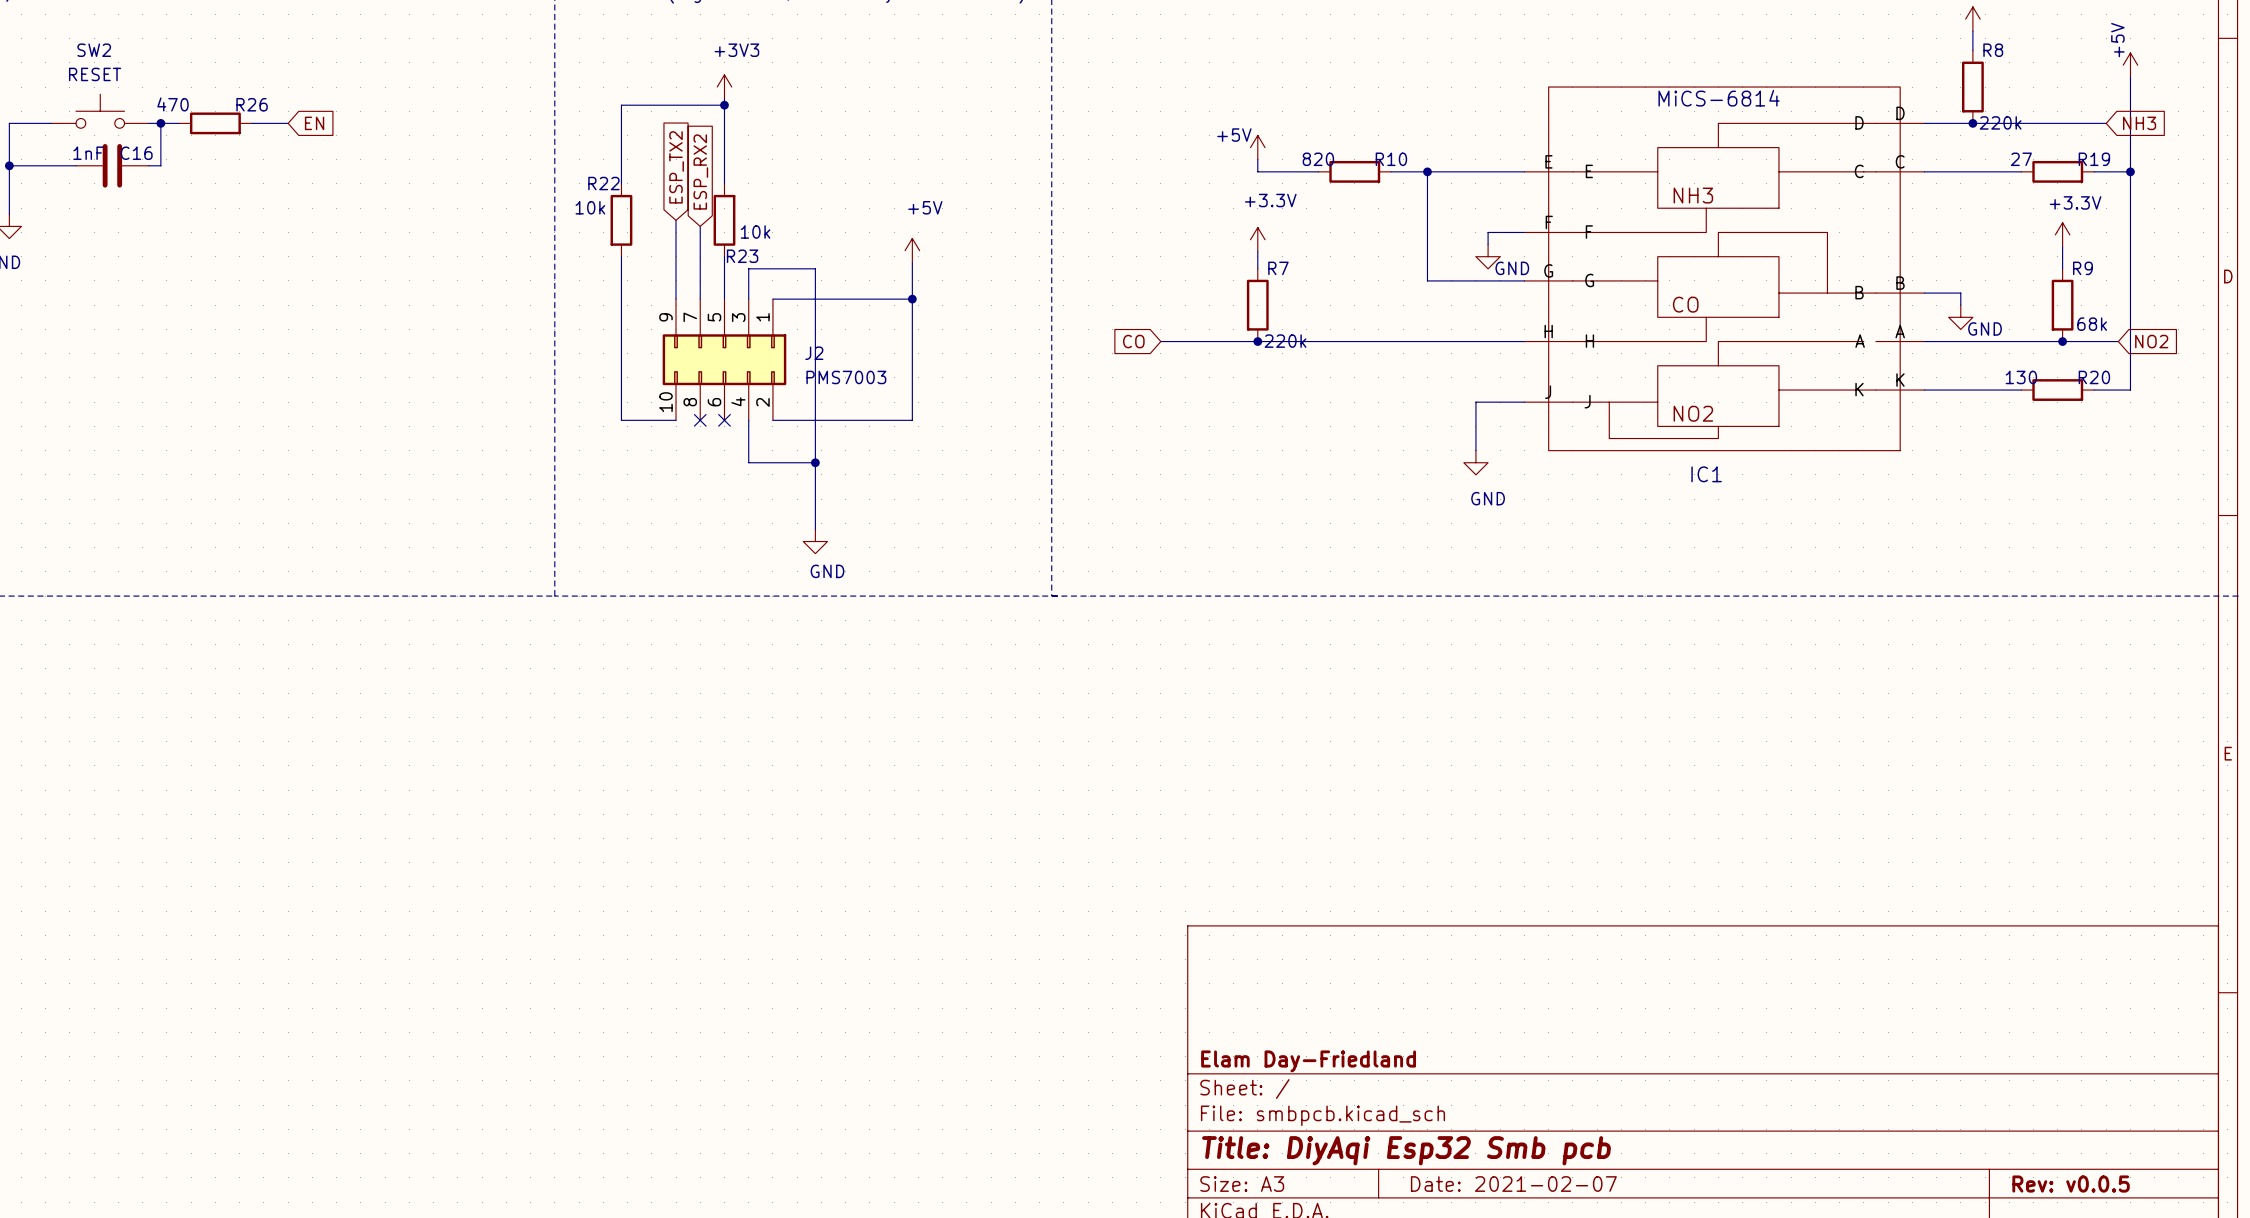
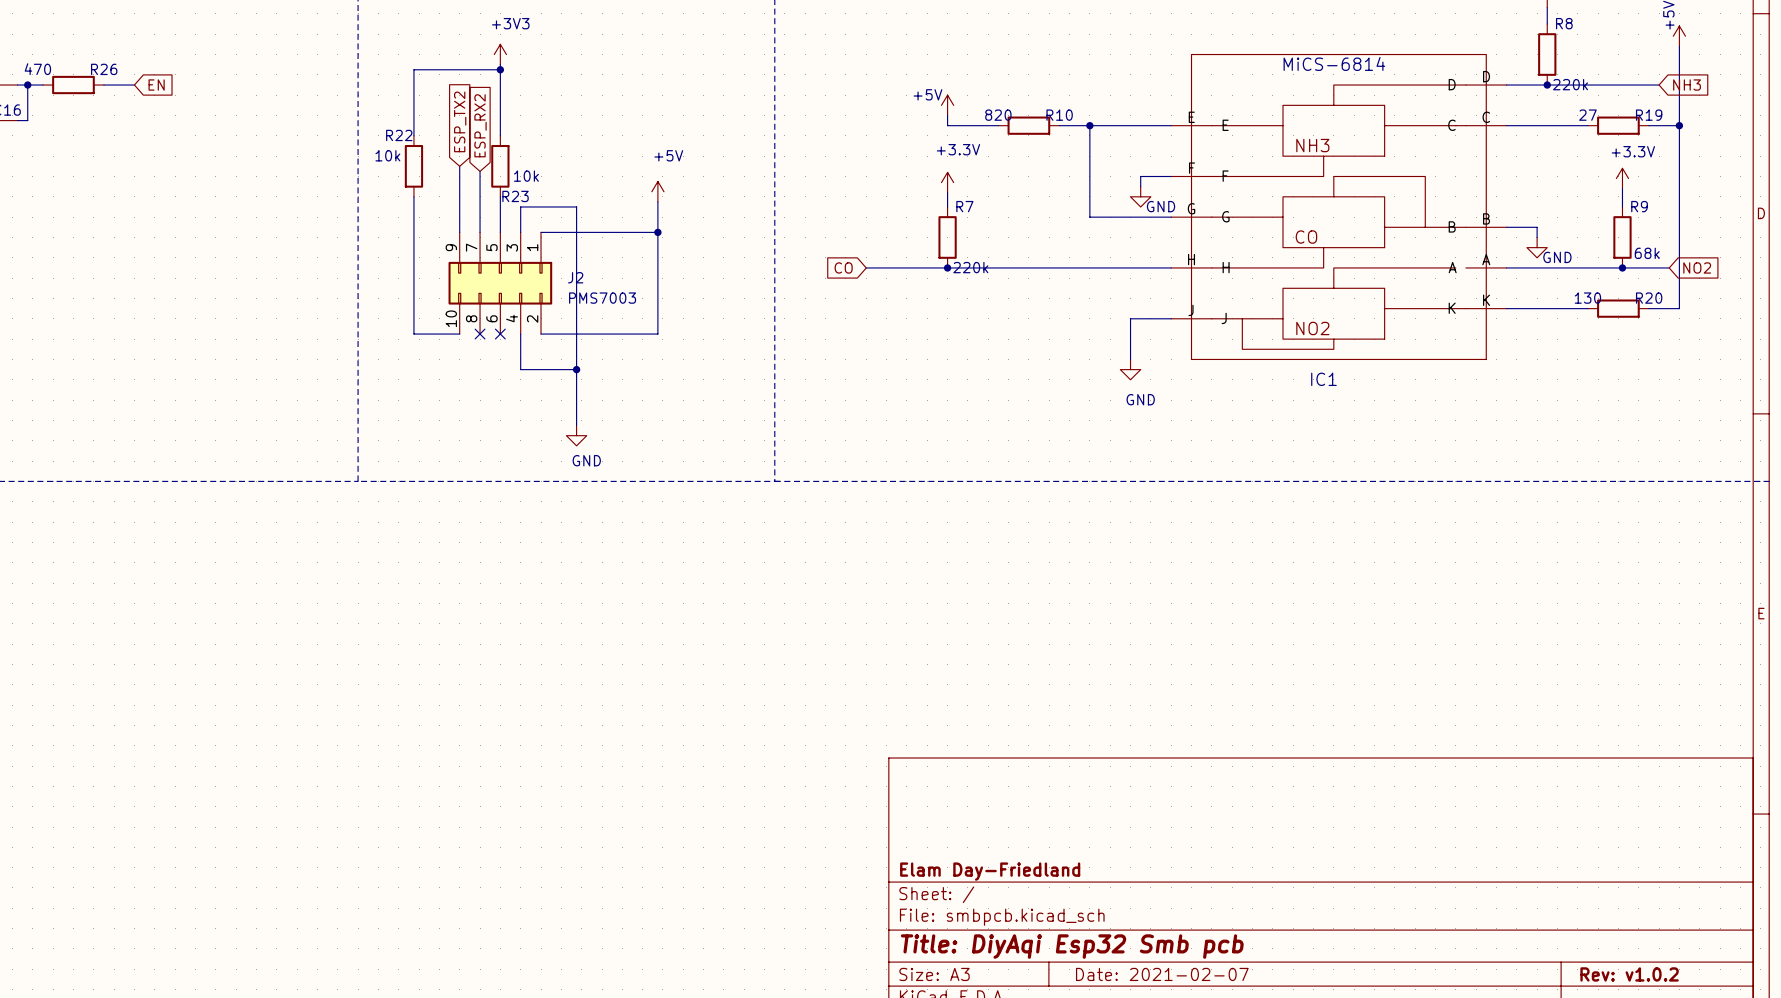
title block: Rev: v0.0.5 (2071, 1184) -> Rev: v1.0.2 (1629, 974)

